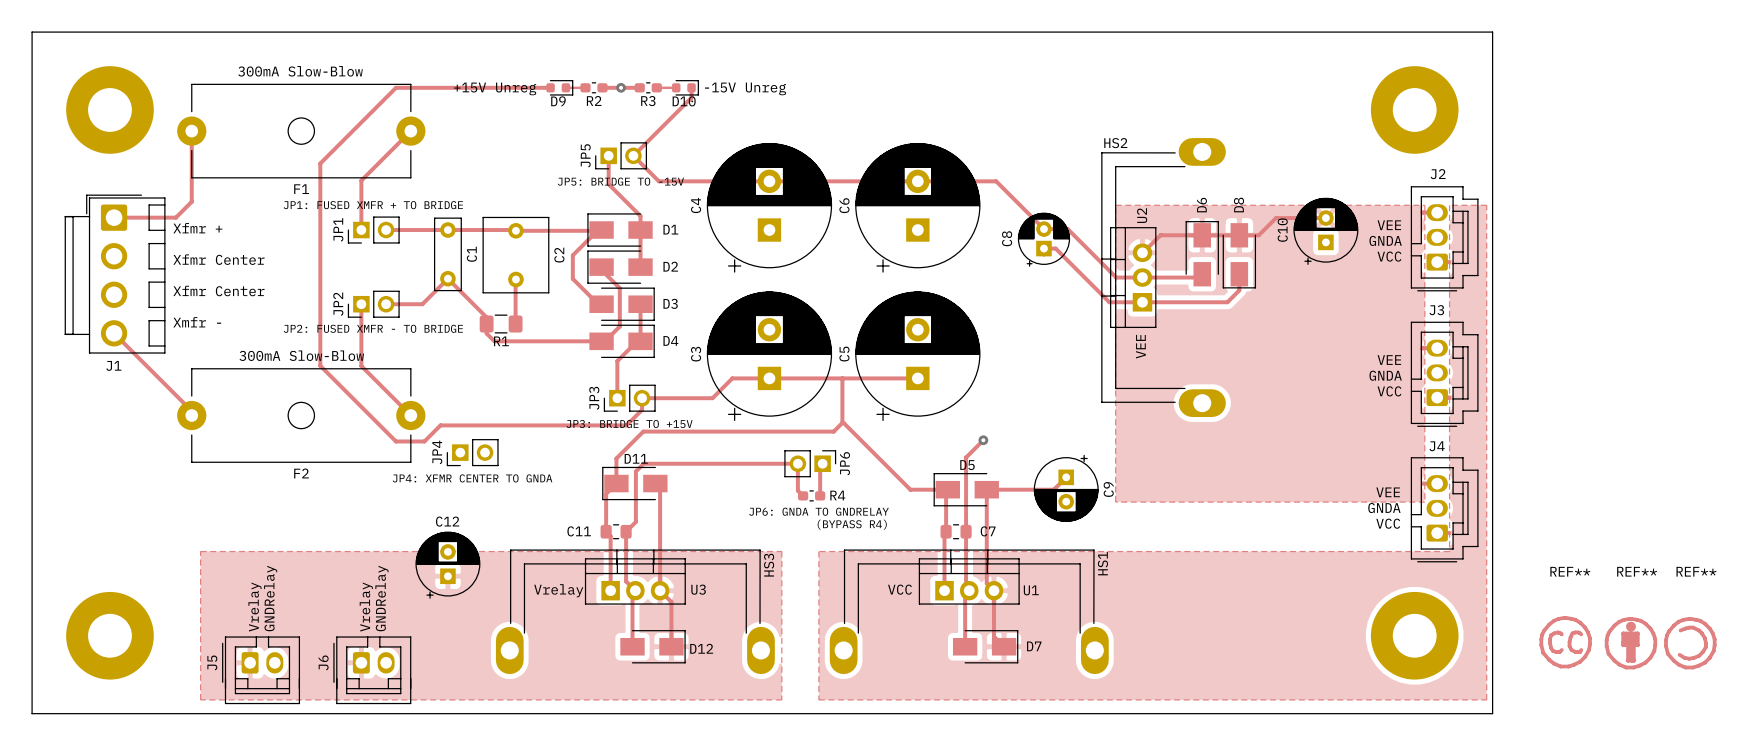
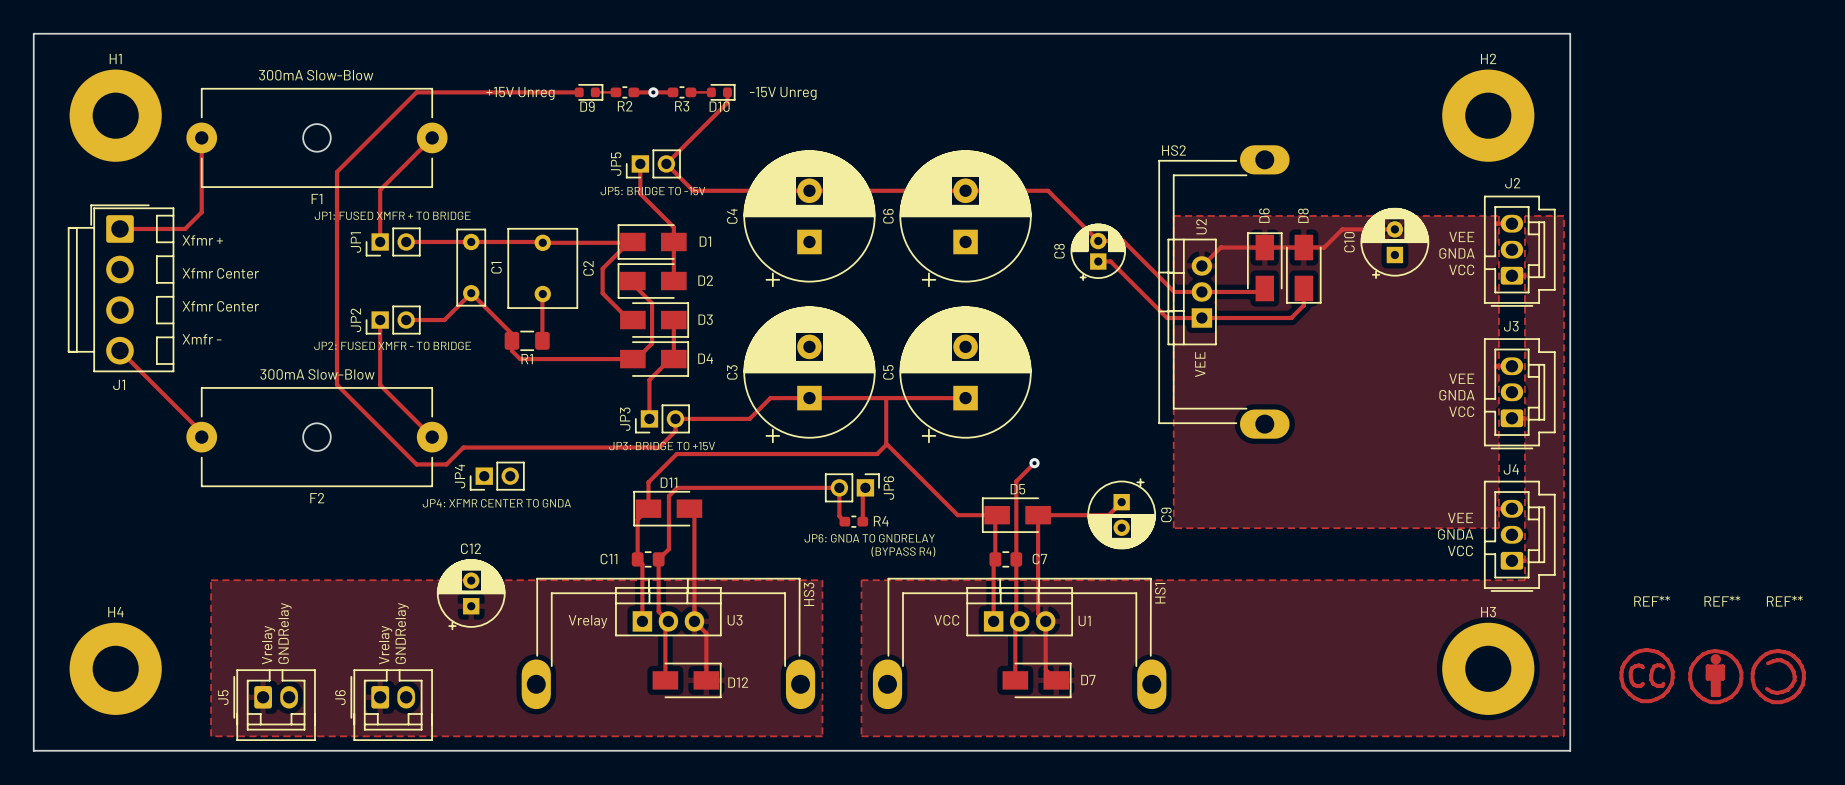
H2 name: none -> H2 (1488, 58)
H1 name: none -> H1 (115, 58)
H4 name: none -> H4 (115, 612)
H3 name: none -> H3 (1488, 612)

